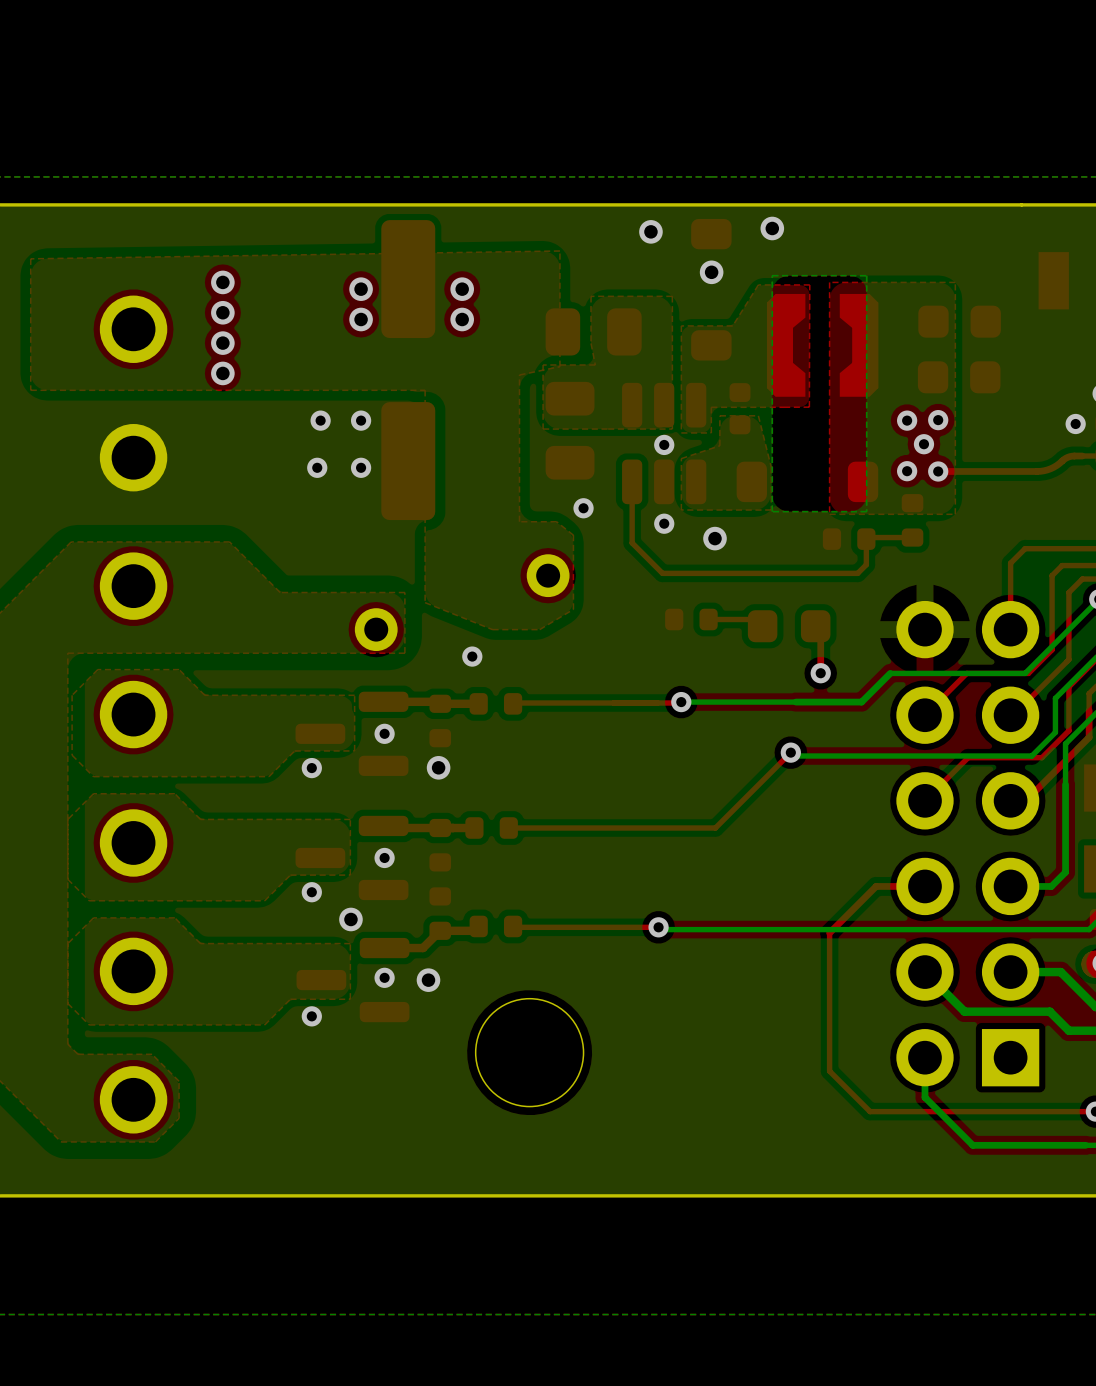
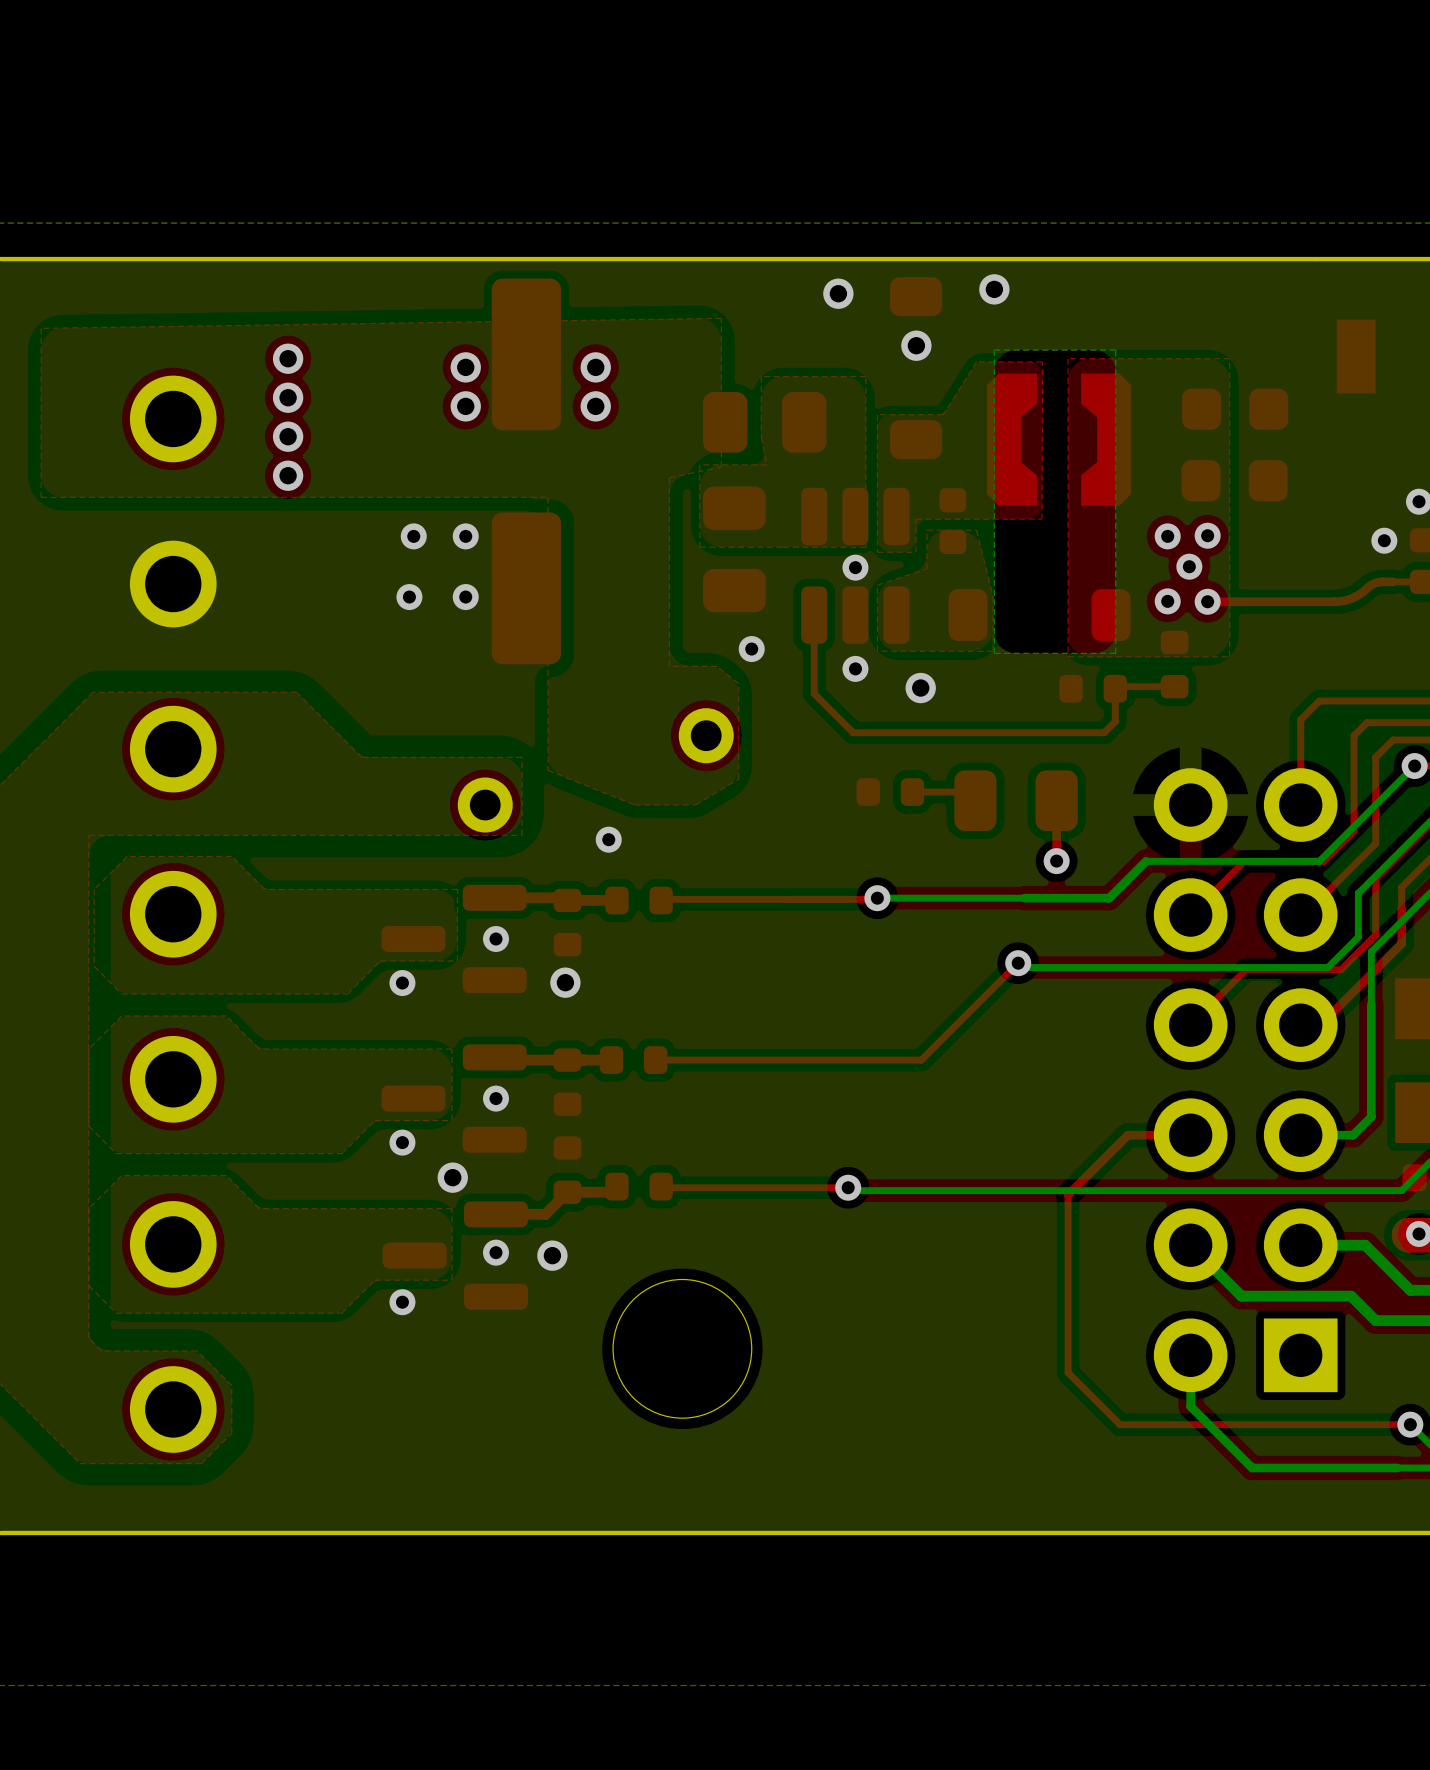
part footprint: [747, 610, 831, 643] -> [954, 770, 1078, 832]

